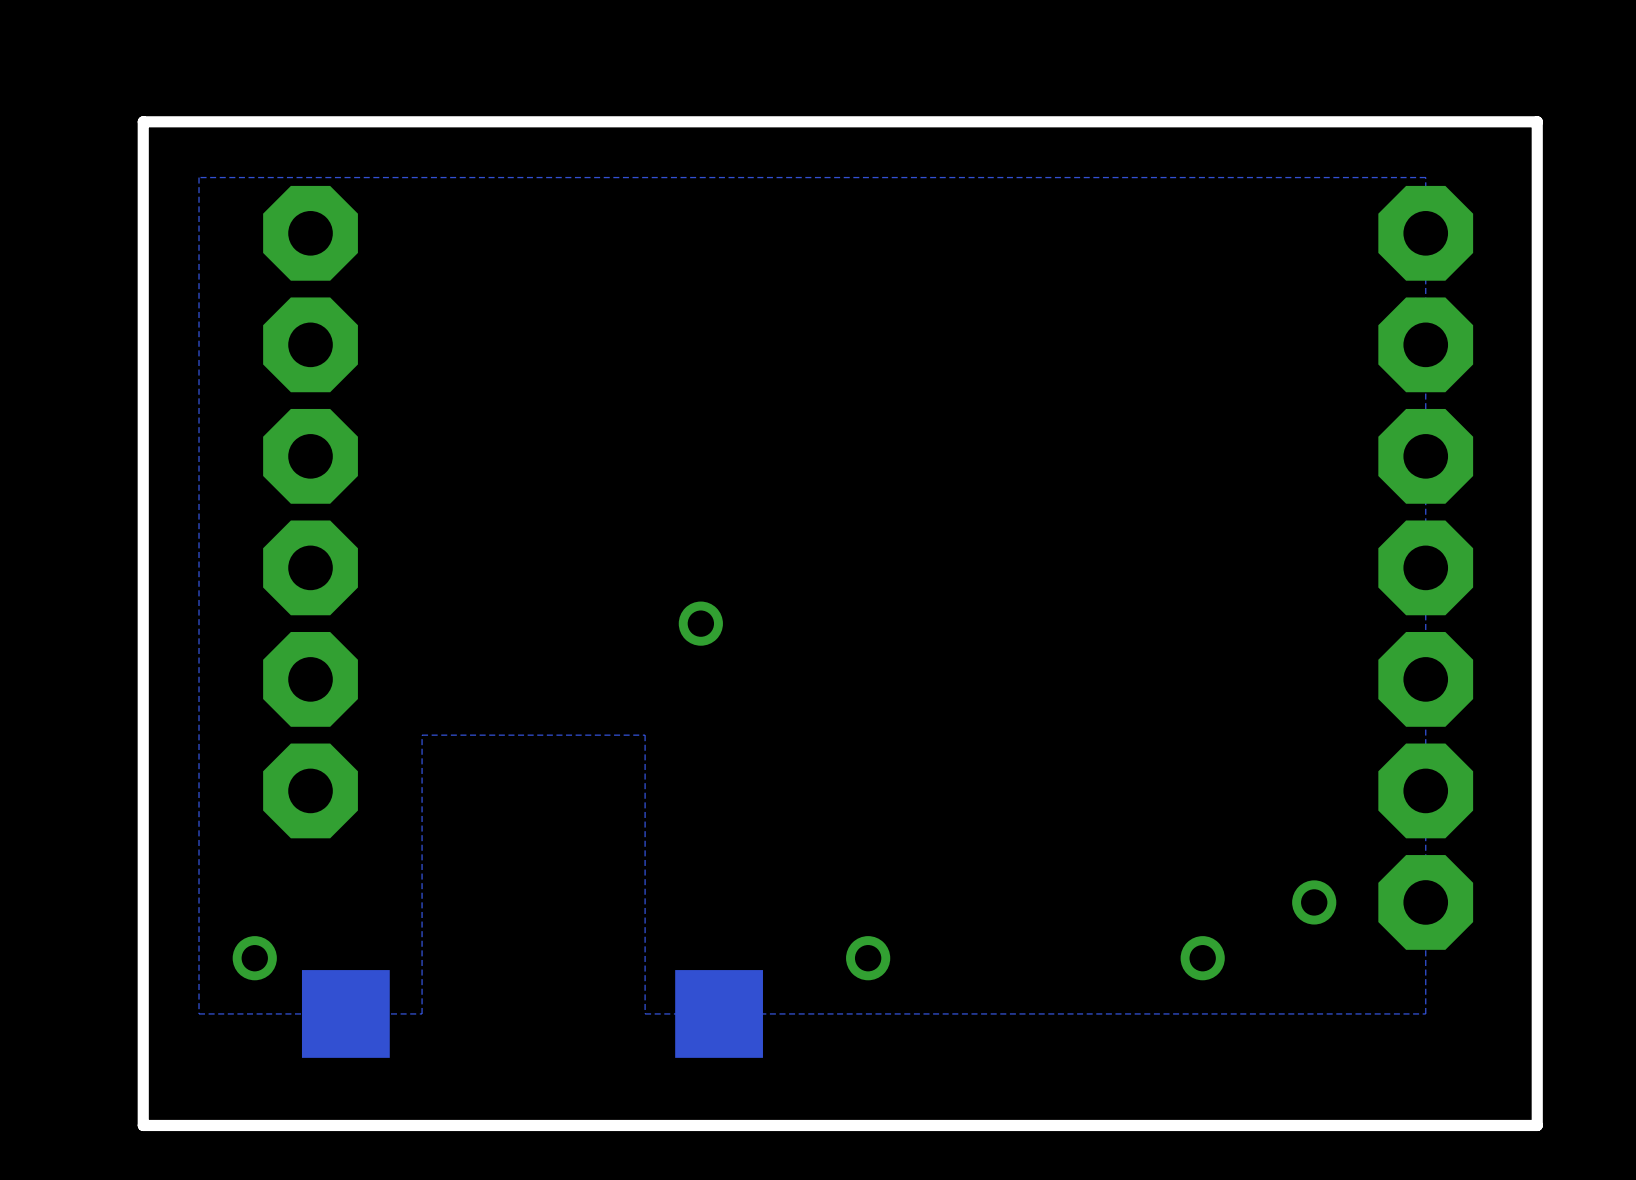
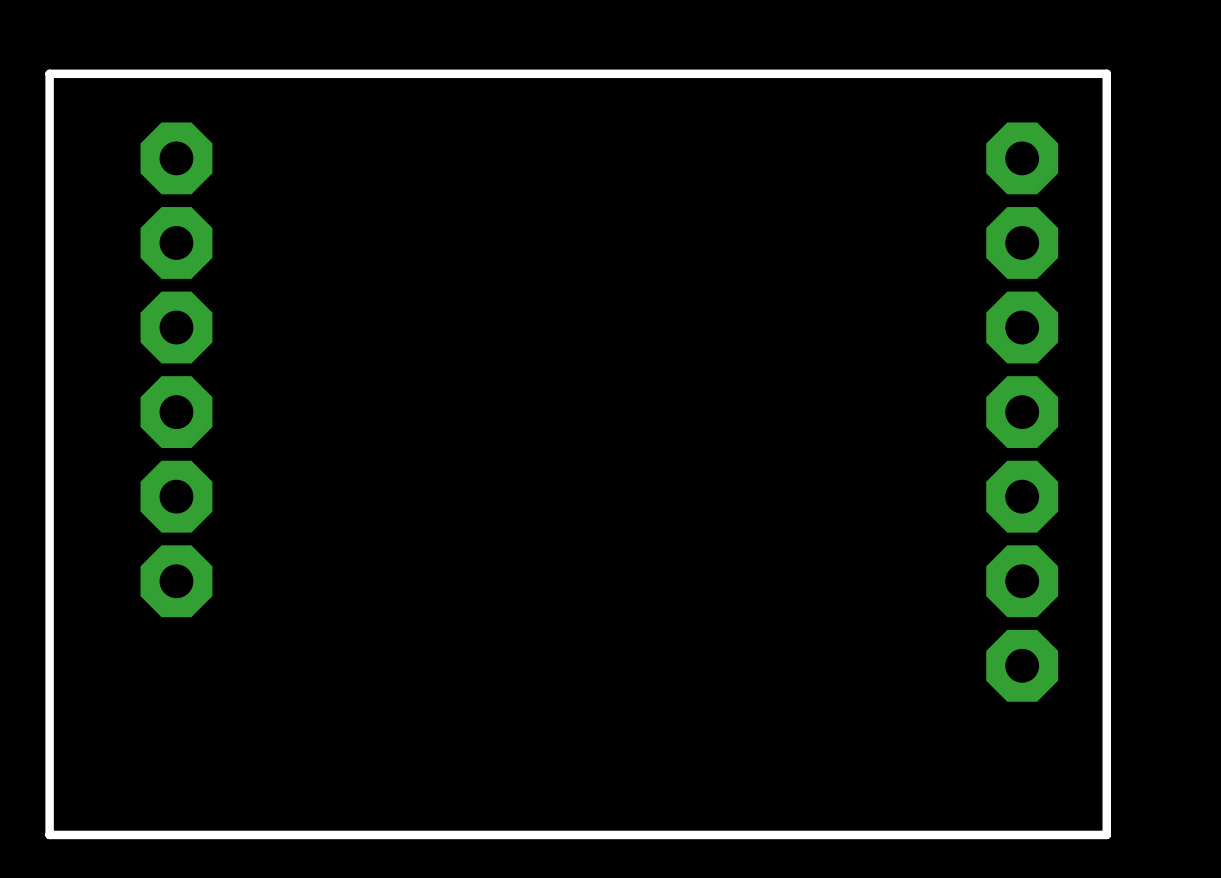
zone outline: (1425, 177) (1425, 1013) (645, 1013) (645, 735) (422, 735) (422, 1013) (199, 1013) (199, 177) (1425, 177) -> none
via: (700, 623) -> none
via: (1314, 902) -> none
via: (254, 958) -> none
via: (868, 958) -> none
via: (1202, 958) -> none
part: (345, 1013) -> none
part: (719, 1013) -> none

